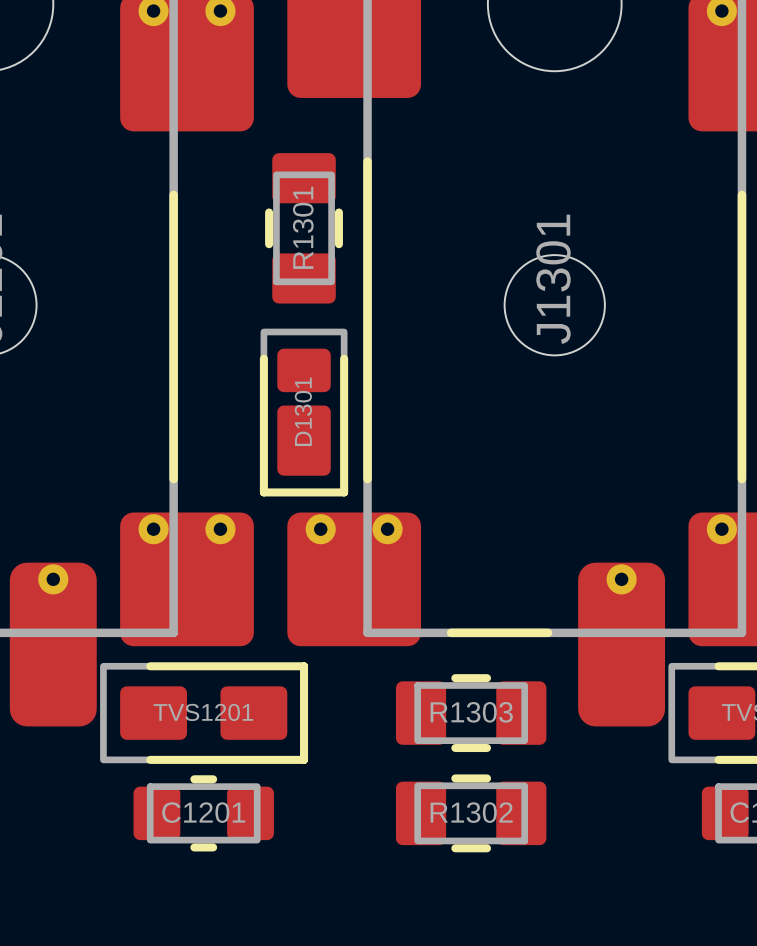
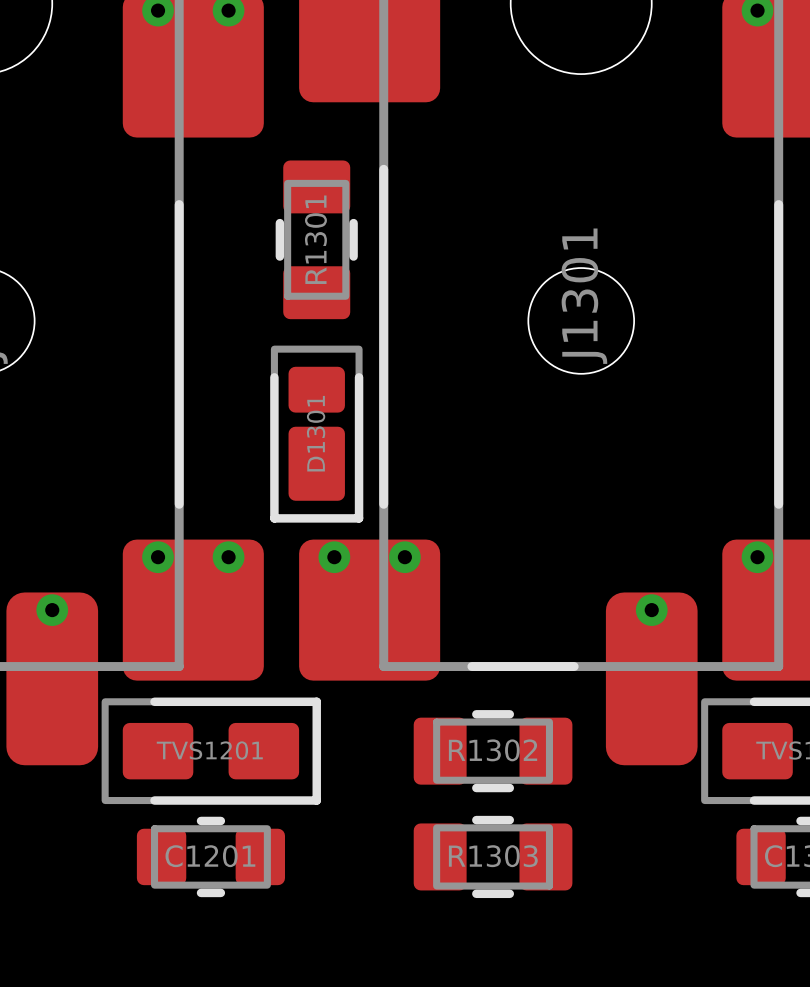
R1303 name: R1303 (471, 712) -> R1302 (493, 750)
R1302 name: R1302 (471, 812) -> R1303 (493, 856)

